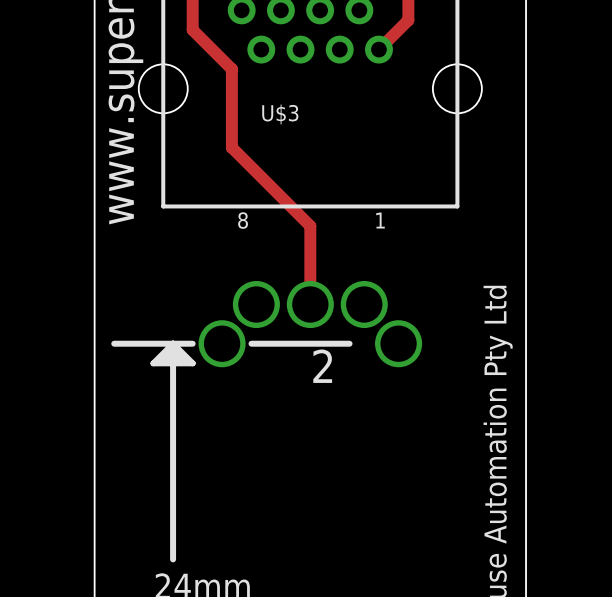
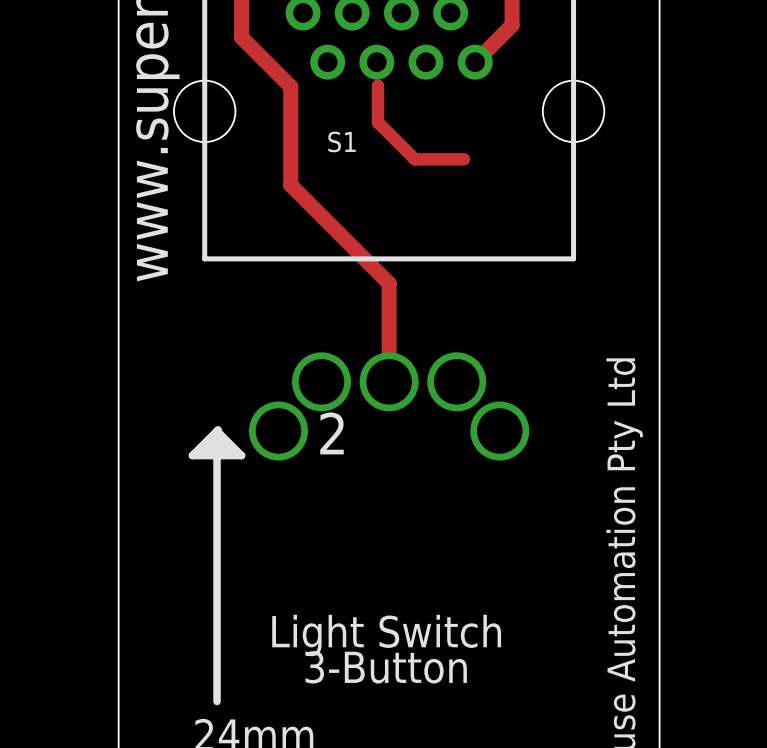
track: none -> (377, 85) (377, 122) (414, 159) (464, 159)
U$3 name: U$3 (280, 114) -> S1 (342, 141)
text: 8 (243, 220) -> none
text: 1 (380, 220) -> none
line: (114, 343) (192, 343) -> none
line: (251, 343) (349, 343) -> none
text position: 2 (322, 366) -> 2 (332, 433)
text: none -> Light Switch (386, 635)
text: none -> 3-Button (386, 667)

